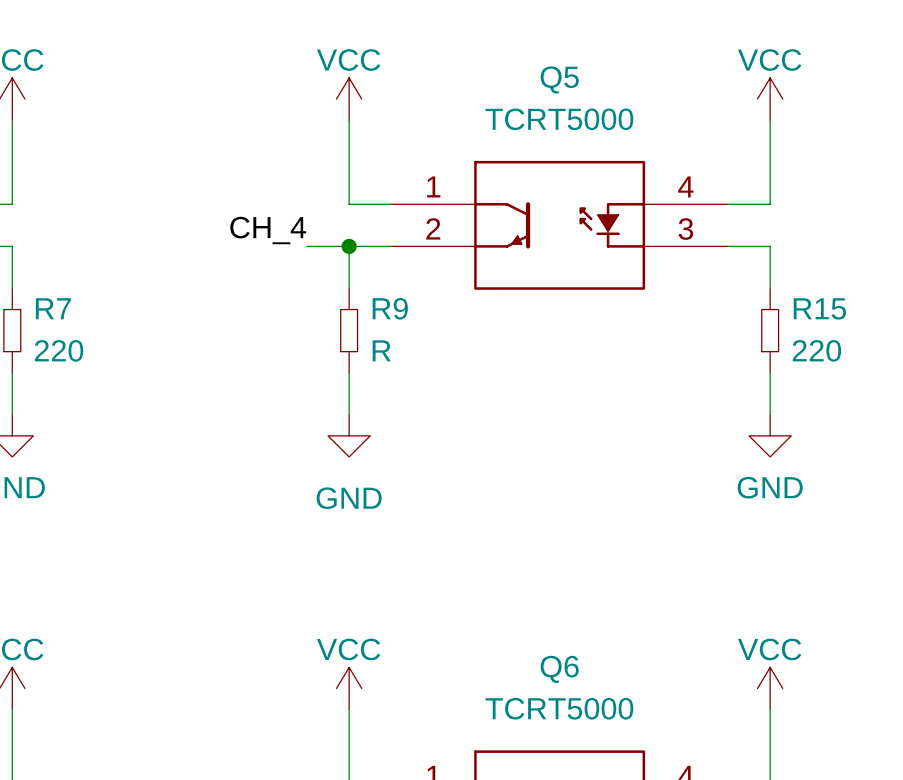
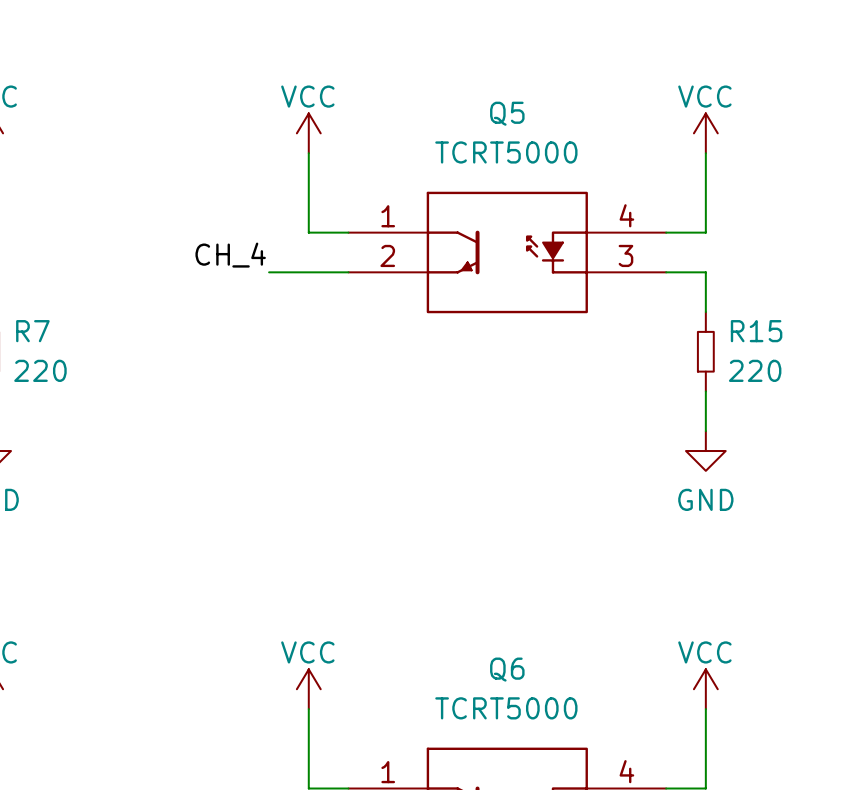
wire: (349, 246) (349, 288) -> none
junction: (349, 246) -> none
R9: R (349, 330) -> none
wire: (349, 372) (349, 414) -> none
power symbol: GND (349, 435) -> none

